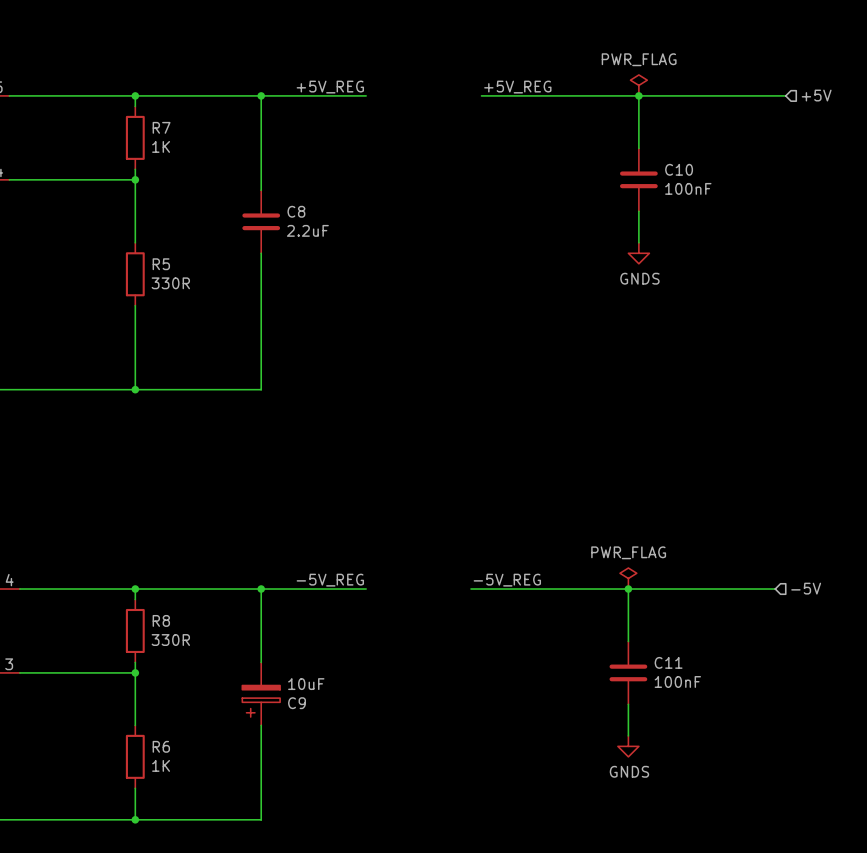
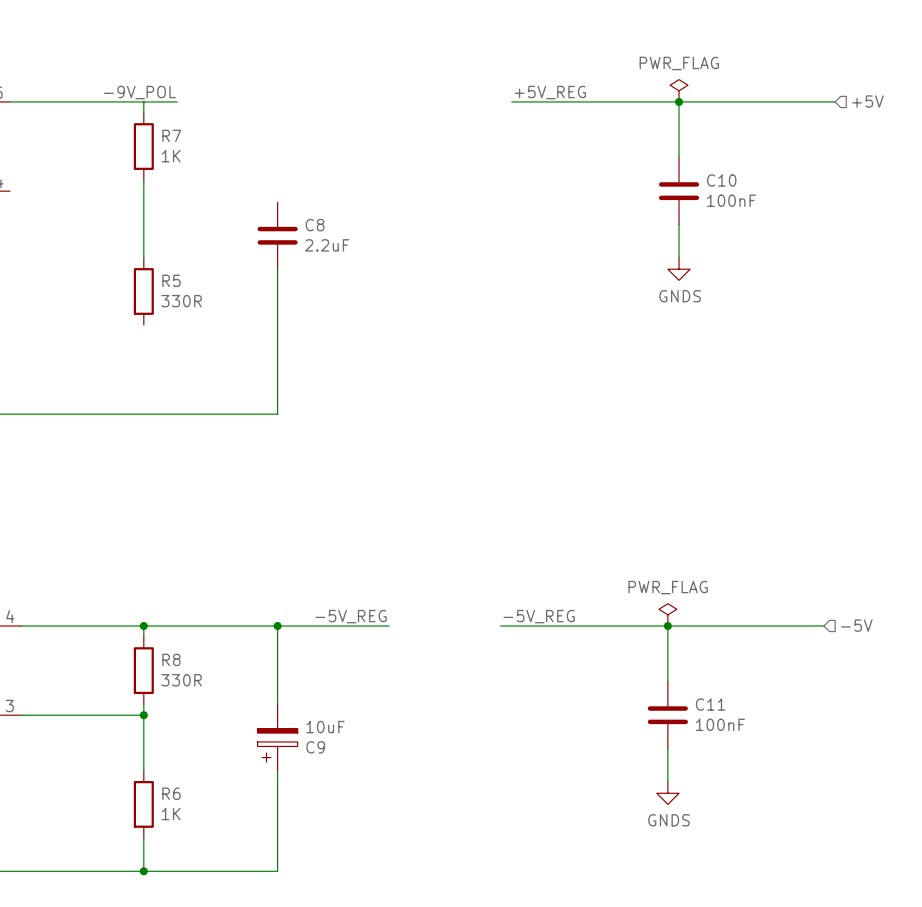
label: none -> -9V_POL (140, 92)
label: +5V_REG (330, 87) -> none
junction: (135, 95) -> none
wire: (166, 95) (366, 95) -> none
wire: (261, 95) (261, 190) -> none
junction: (261, 95) -> none
wire: (9, 179) (135, 179) -> none
junction: (135, 179) -> none
wire: (135, 305) (135, 389) -> none
junction: (135, 389) -> none

